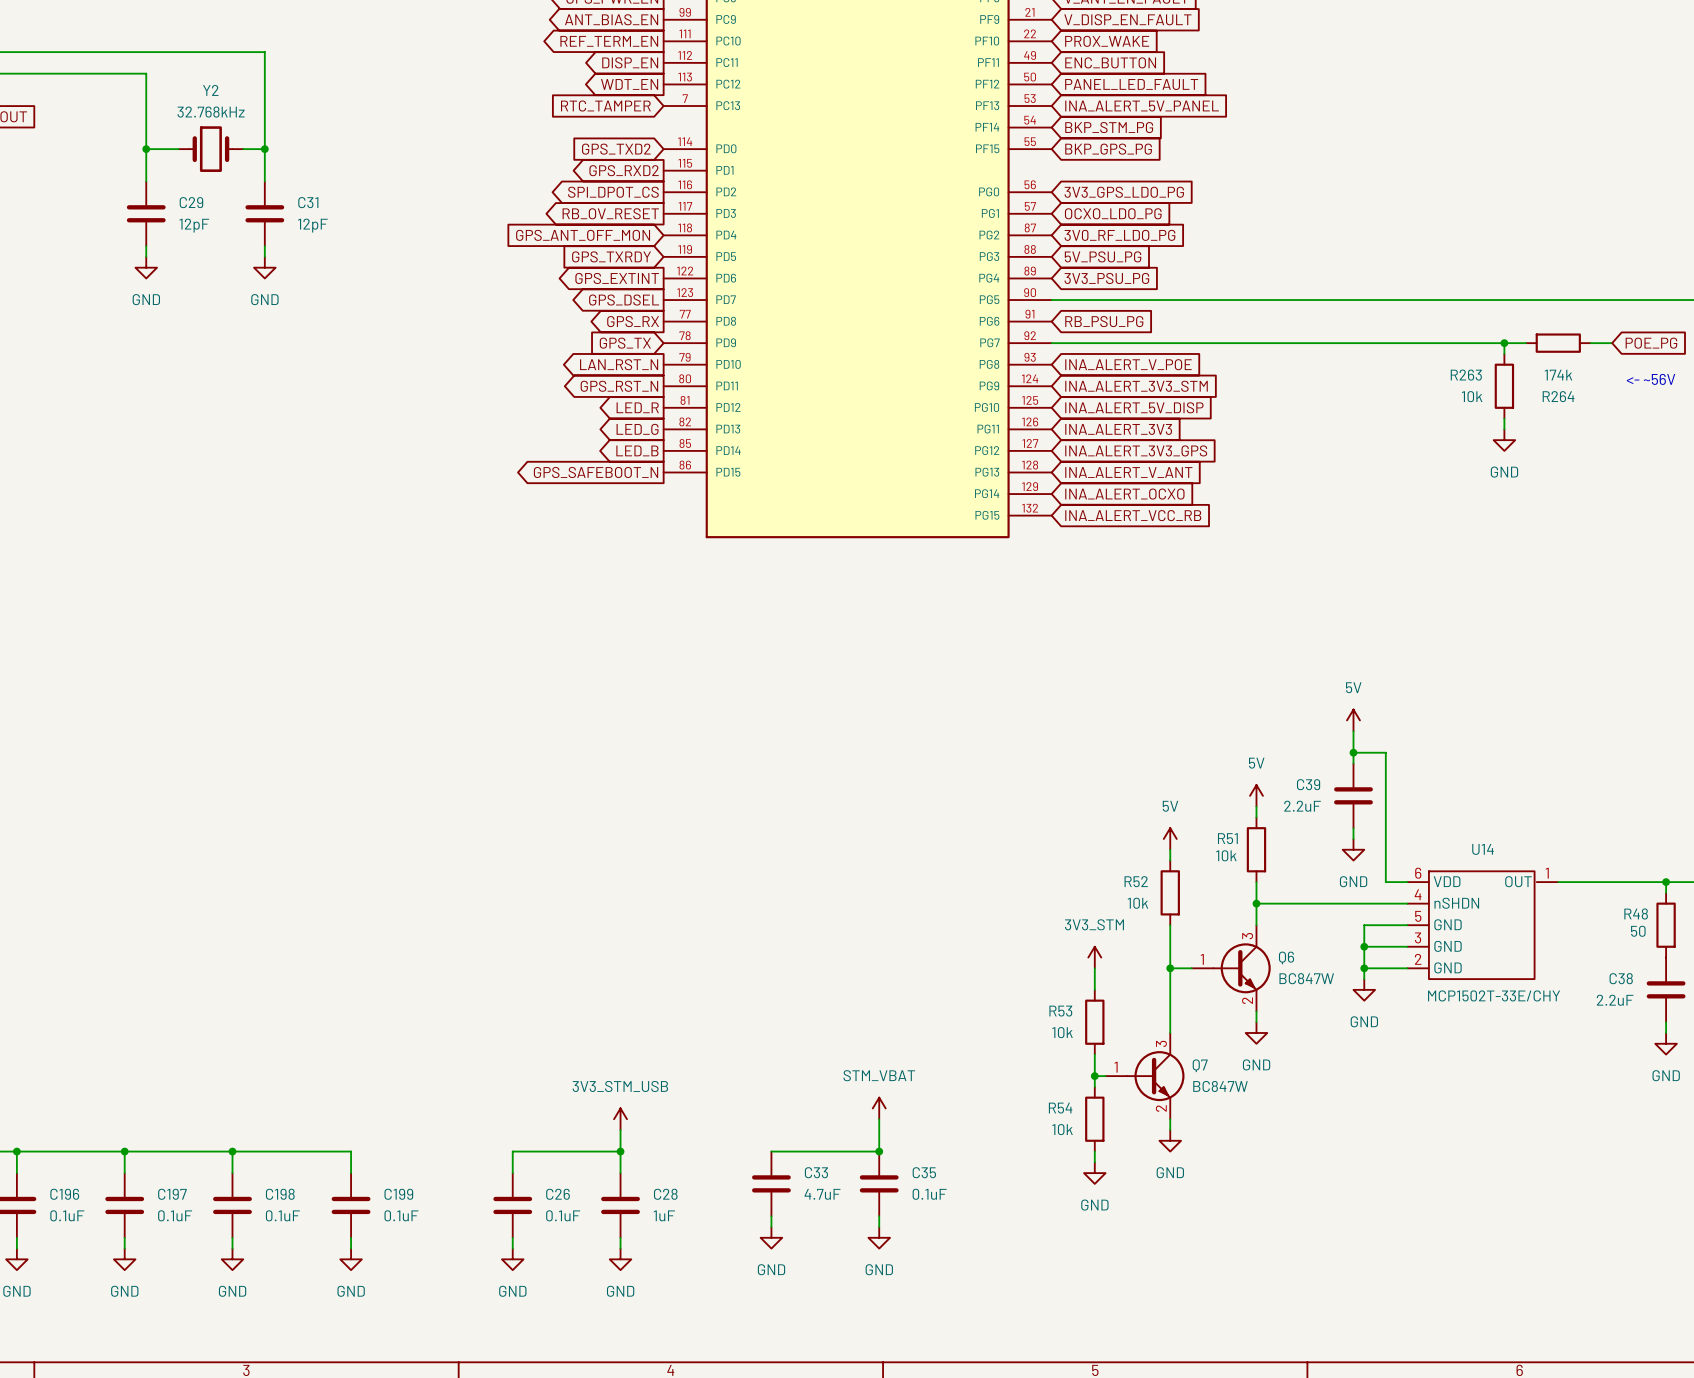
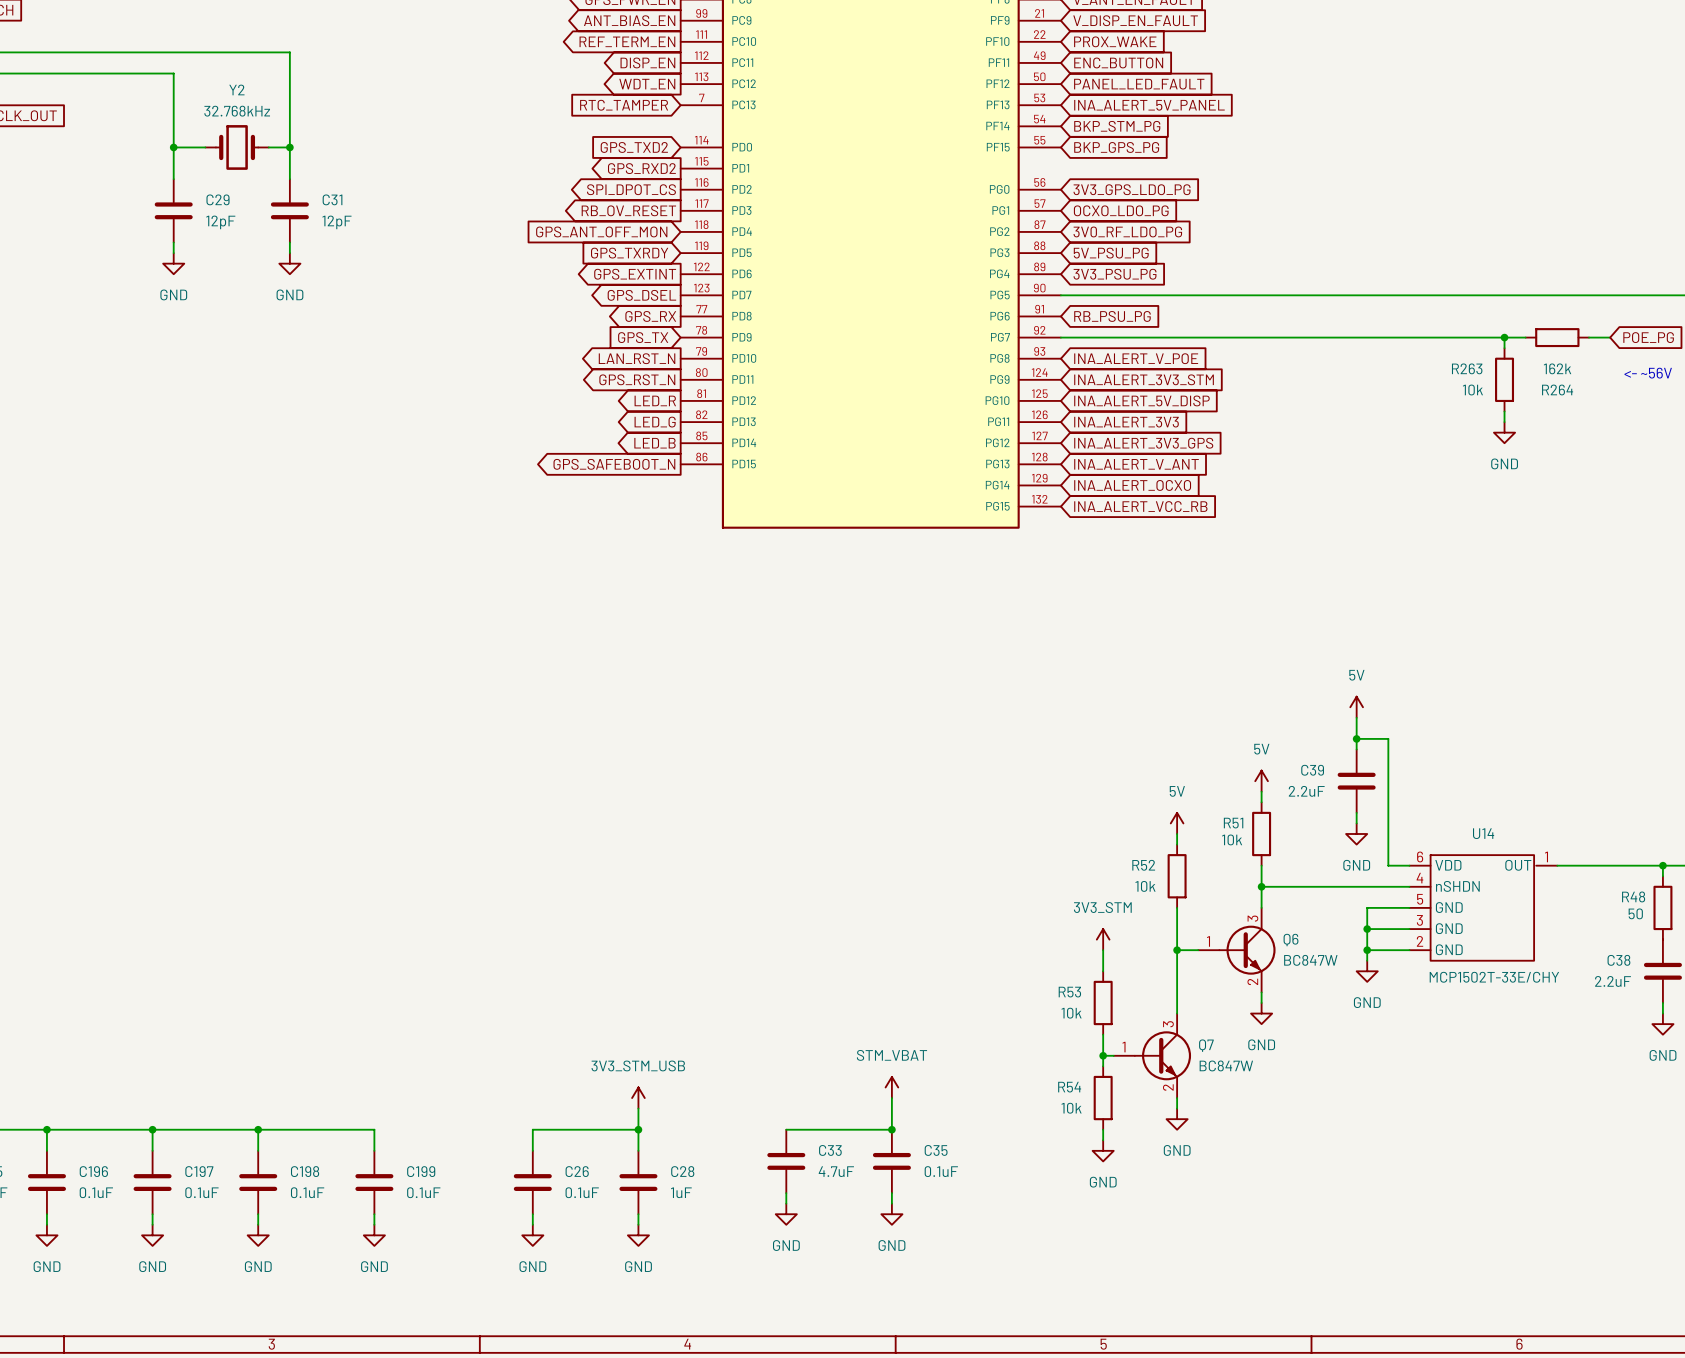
R264 value: 174k (1558, 375) -> 162k (1557, 368)

